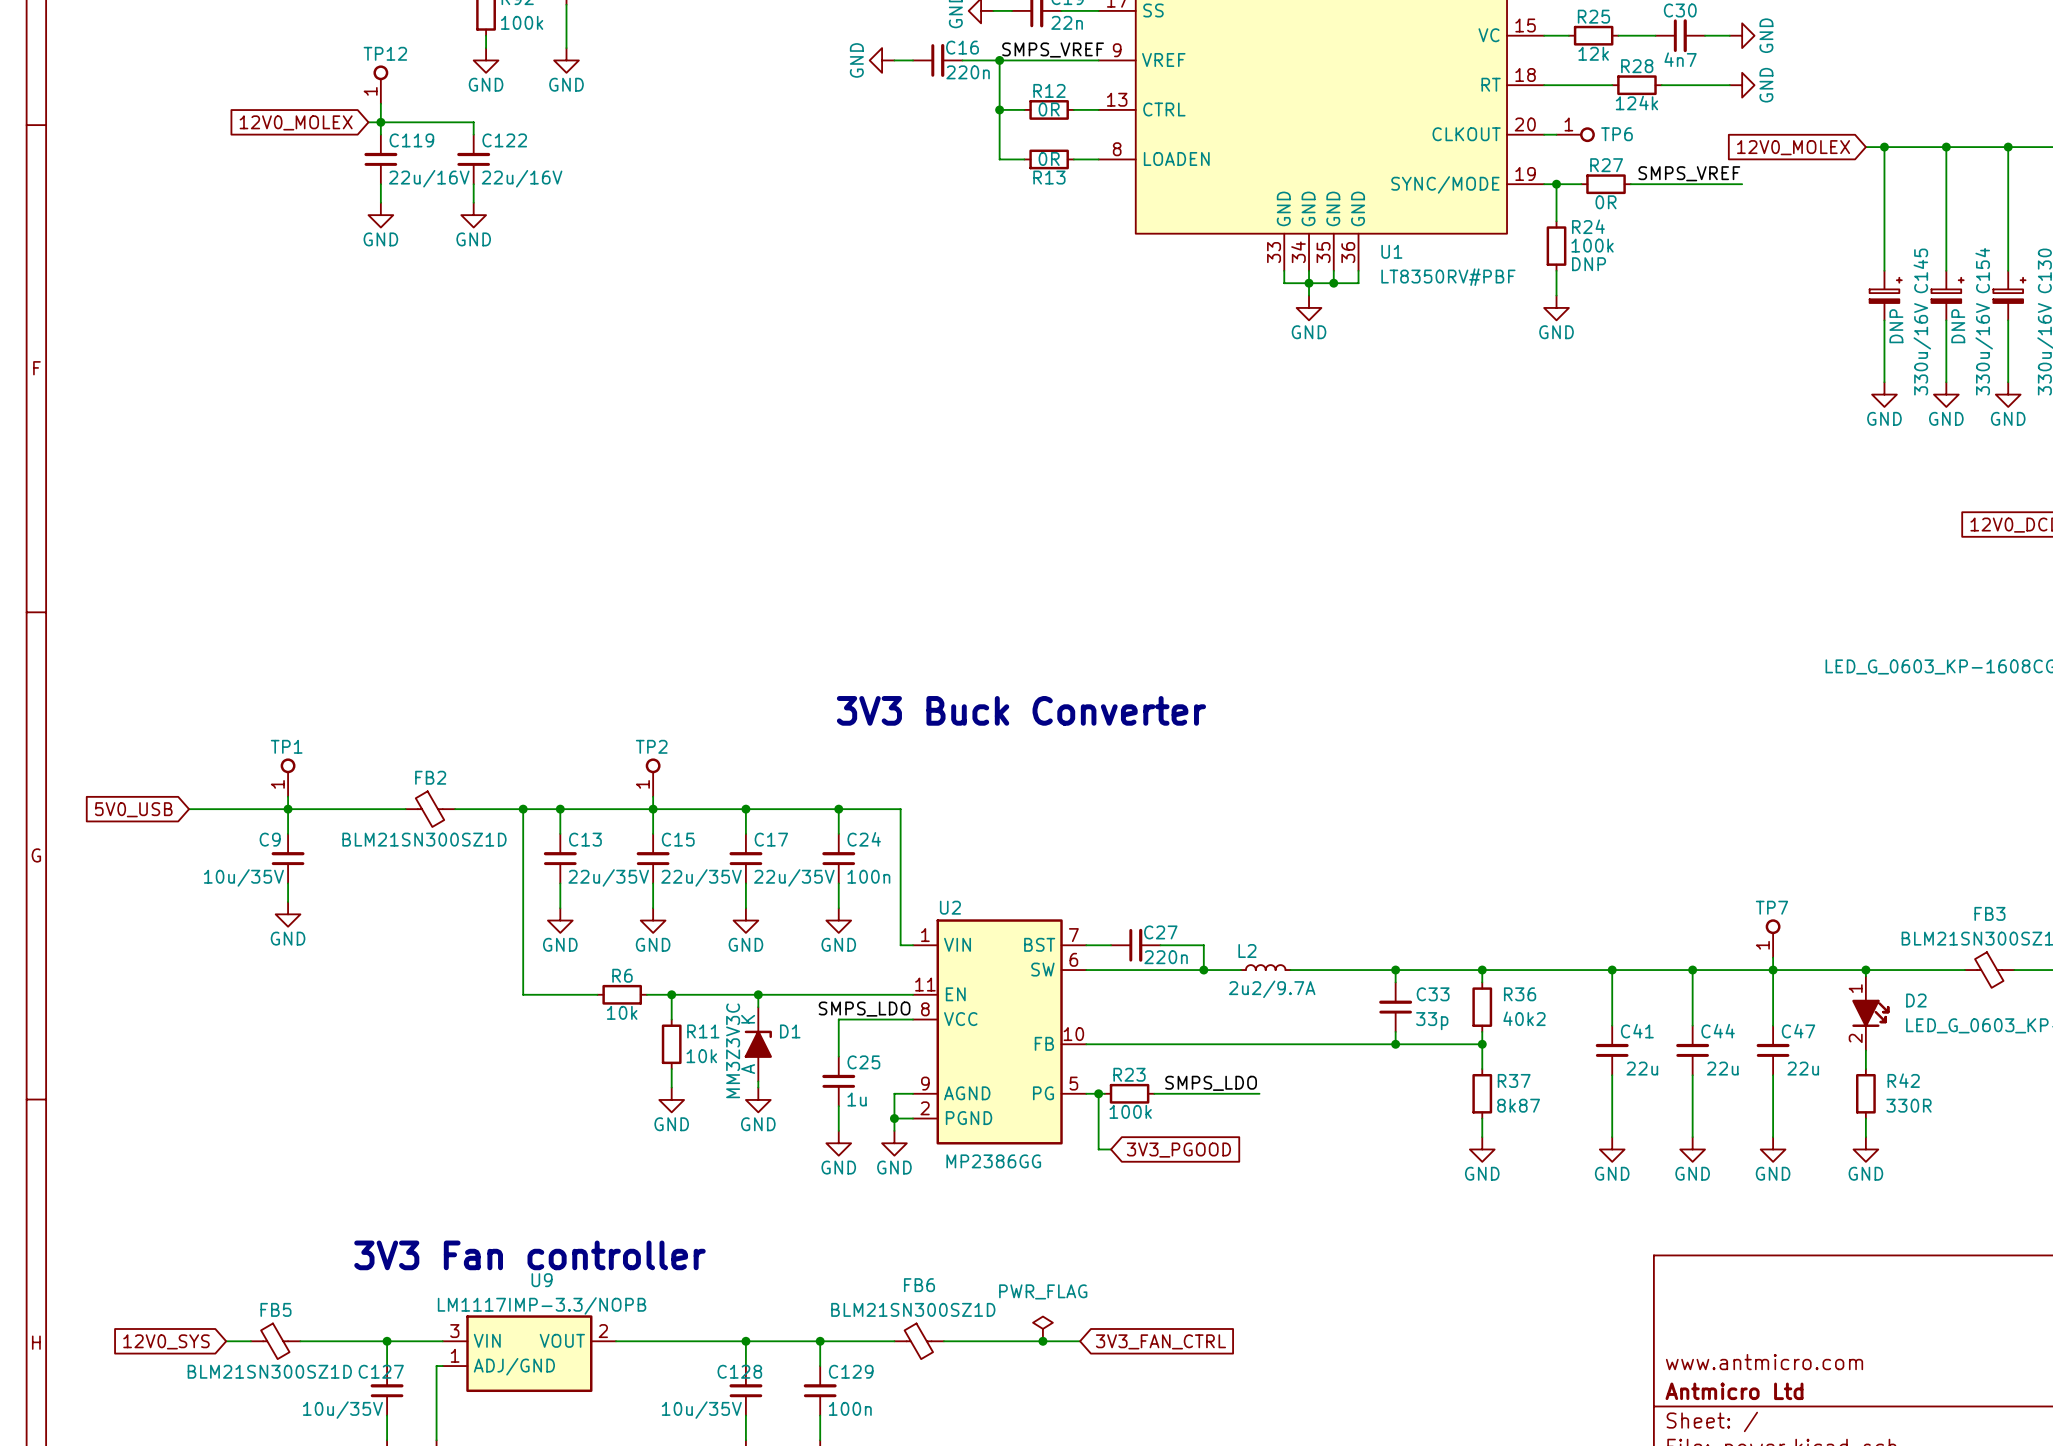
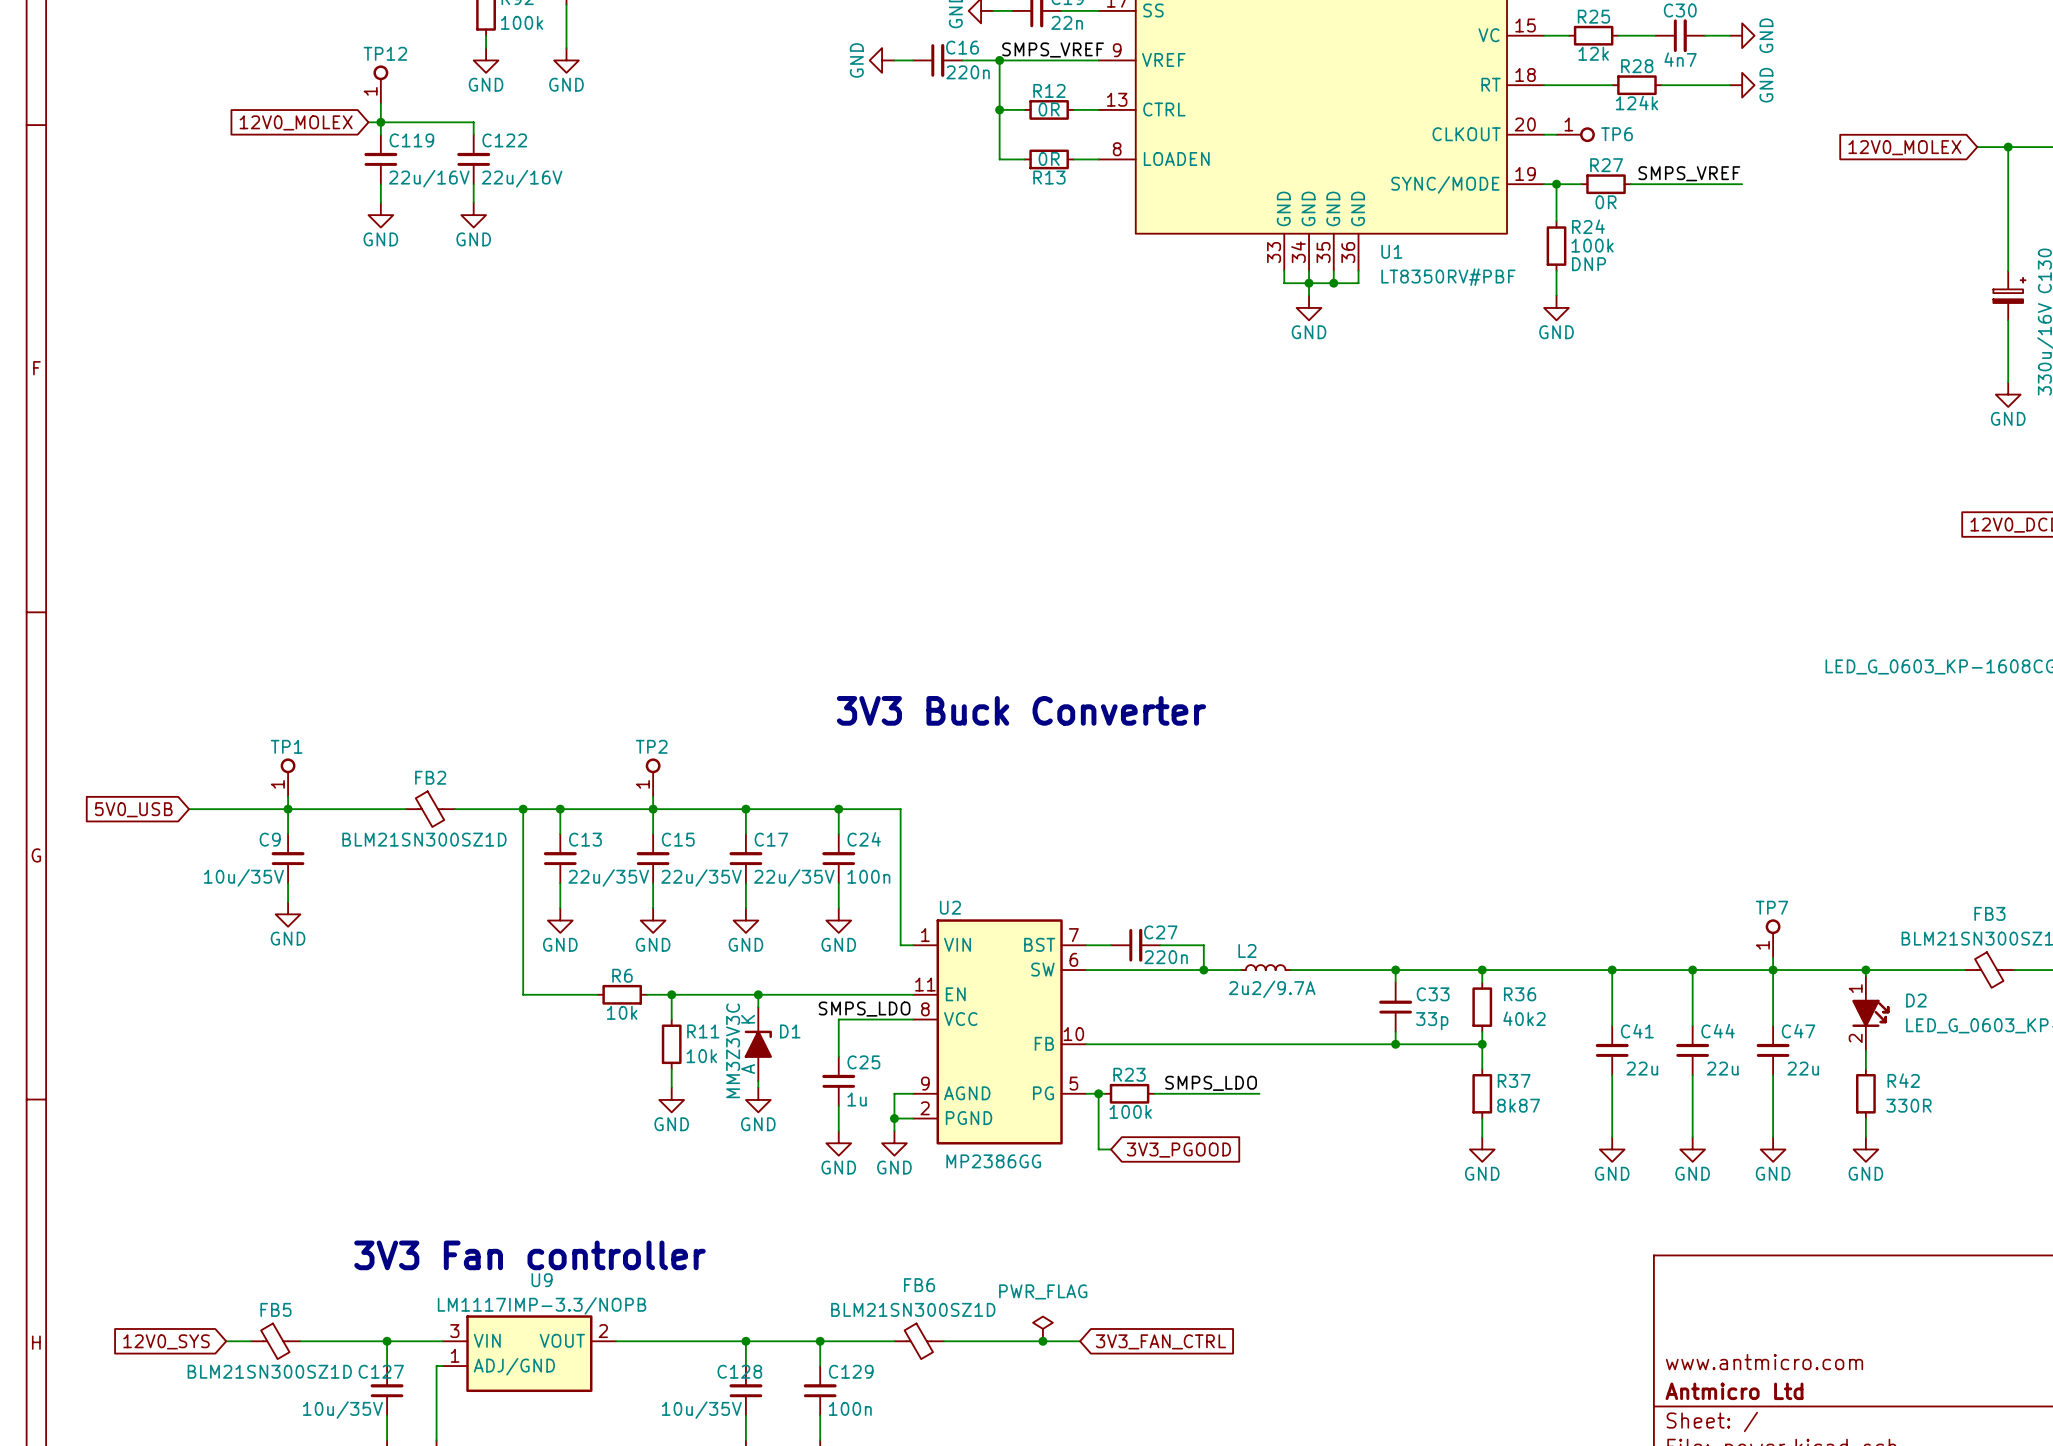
global label position: 12V0_MOLEX (1793, 147) -> 12V0_MOLEX (1904, 147)
wire: (1865, 147) (1977, 147) -> none
wire: (1884, 147) (1884, 270) -> none
junction: (1884, 147) -> none
wire: (1946, 147) (1946, 270) -> none
junction: (1946, 147) -> none
C145: (1885, 295) -> none
C154: (1947, 295) -> none
wire: (1884, 320) (1884, 382) -> none
wire: (1946, 320) (1946, 382) -> none
power symbol: GND (1884, 394) -> none
power symbol: GND (1946, 394) -> none

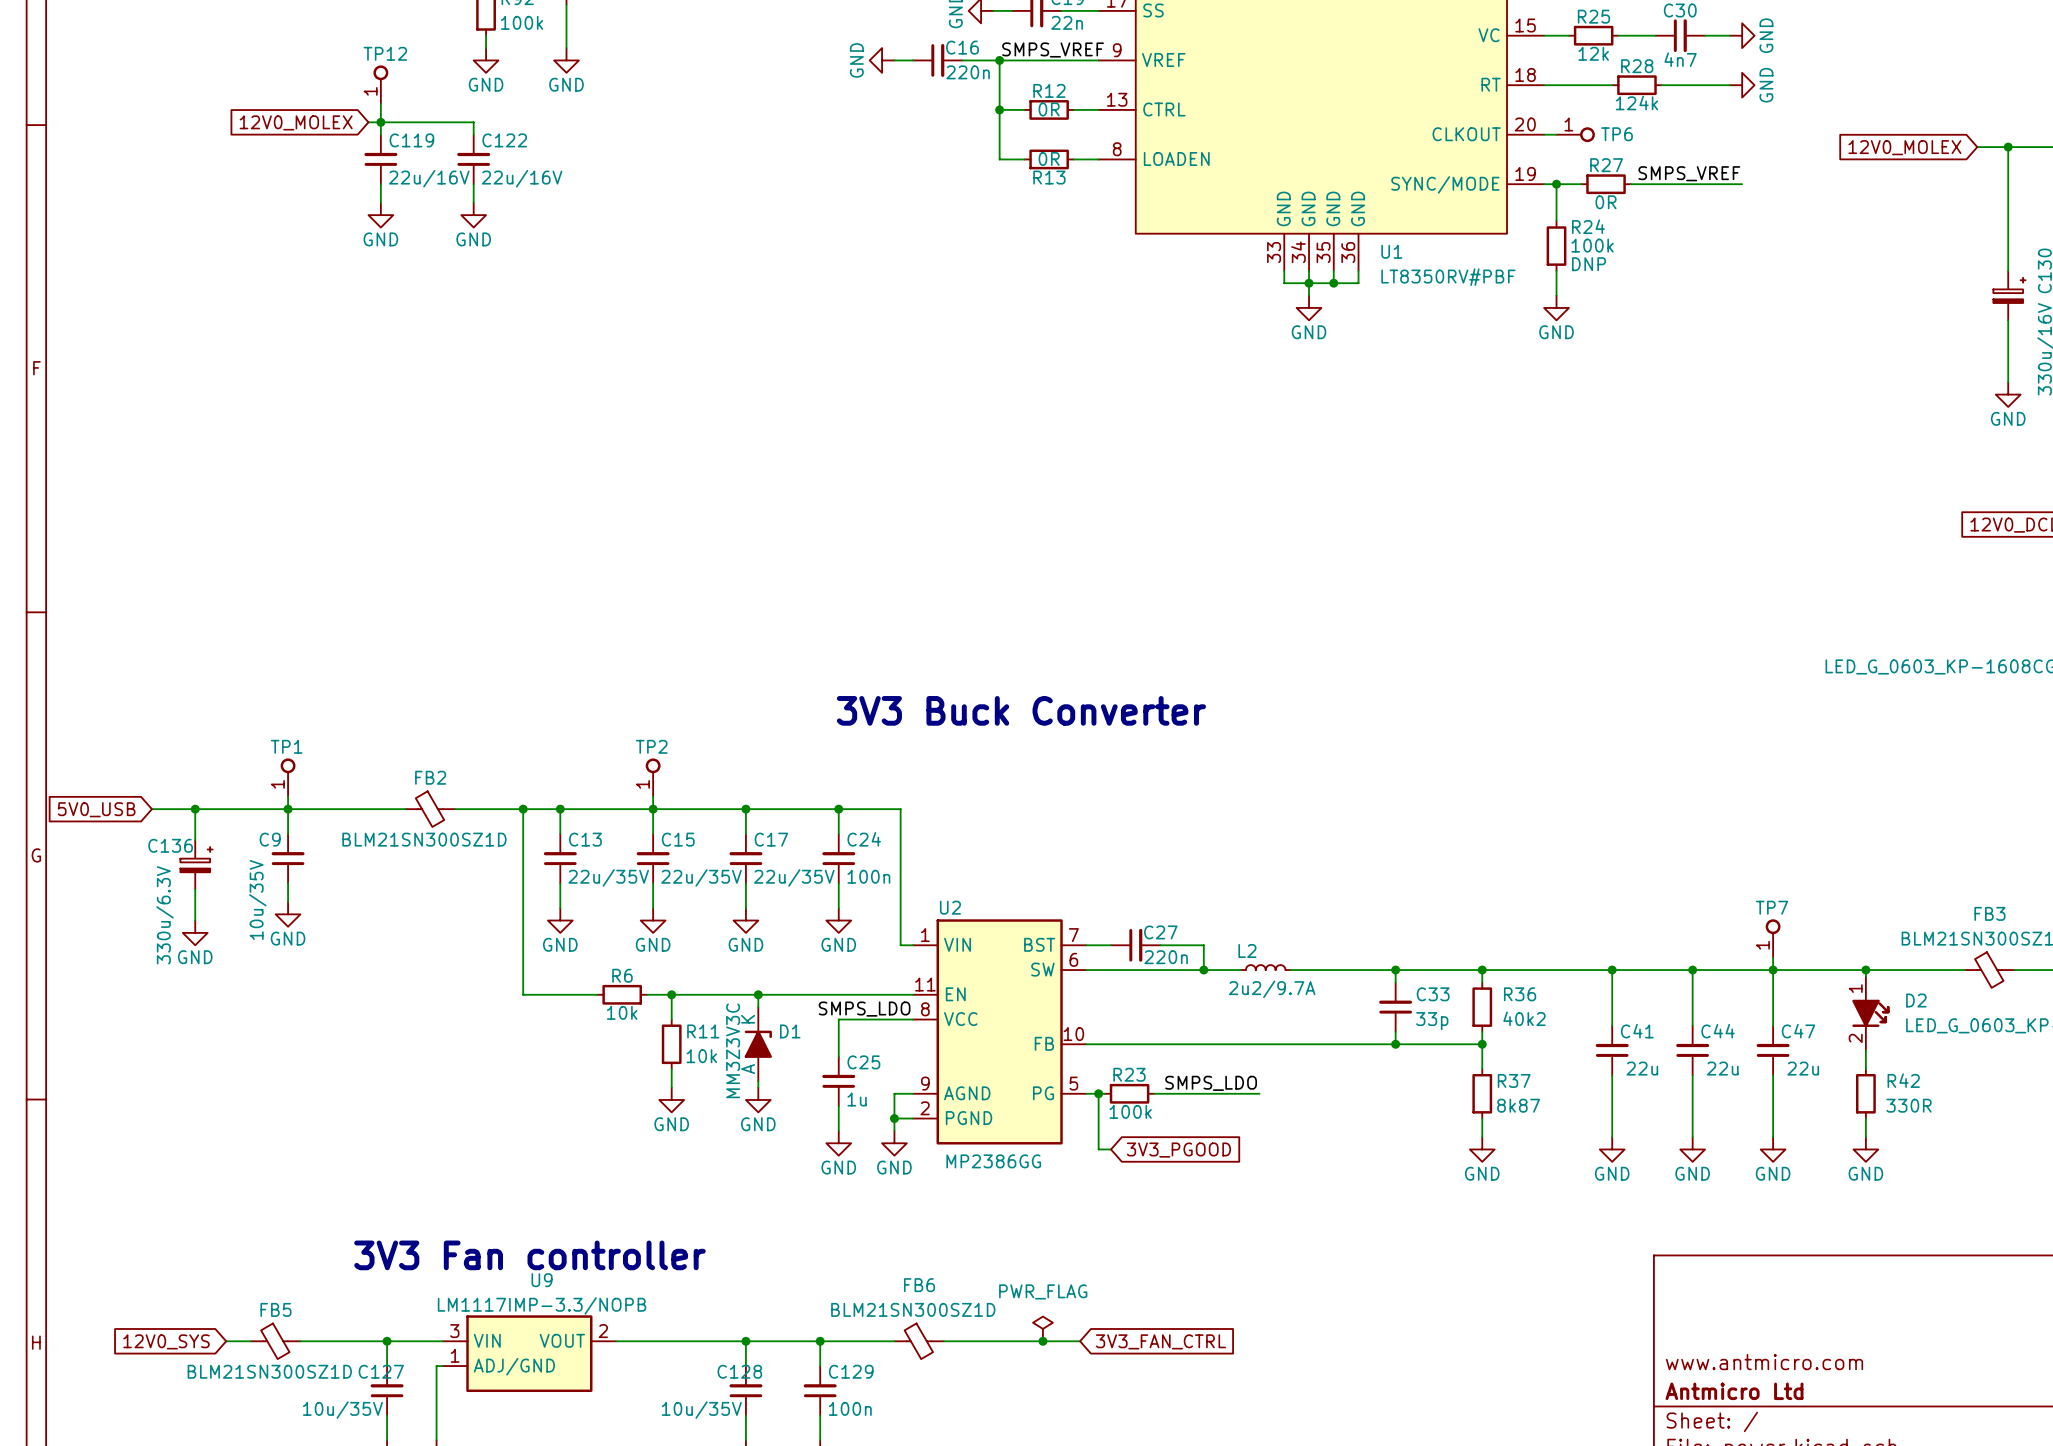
global label position: 5V0_USB (133, 809) -> 5V0_USB (96, 809)
wire: none -> (151, 809) (189, 809)
wire: none -> (195, 809) (195, 840)
junction: none -> (195, 809)
C136: none -> (196, 864)
C9 text rotation: 0° (243, 877) -> 90° counterclockwise (257, 899)
wire: none -> (195, 889) (195, 920)
power symbol: none -> GND (195, 932)

